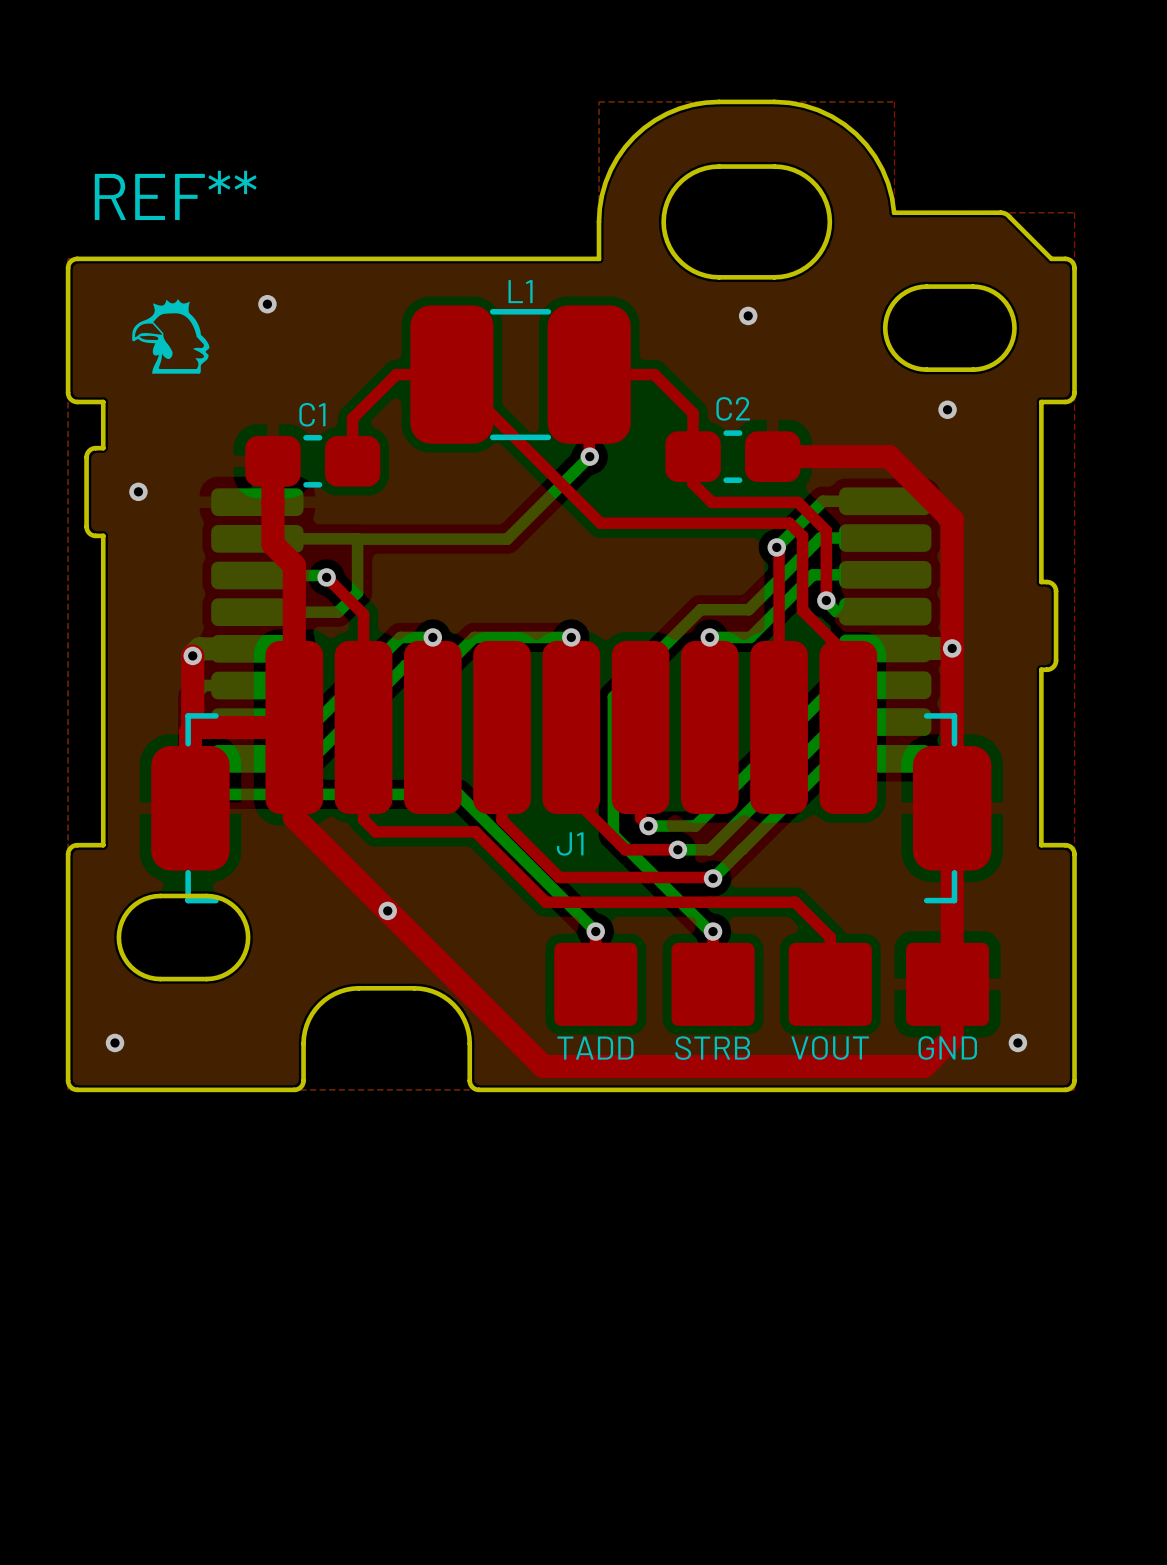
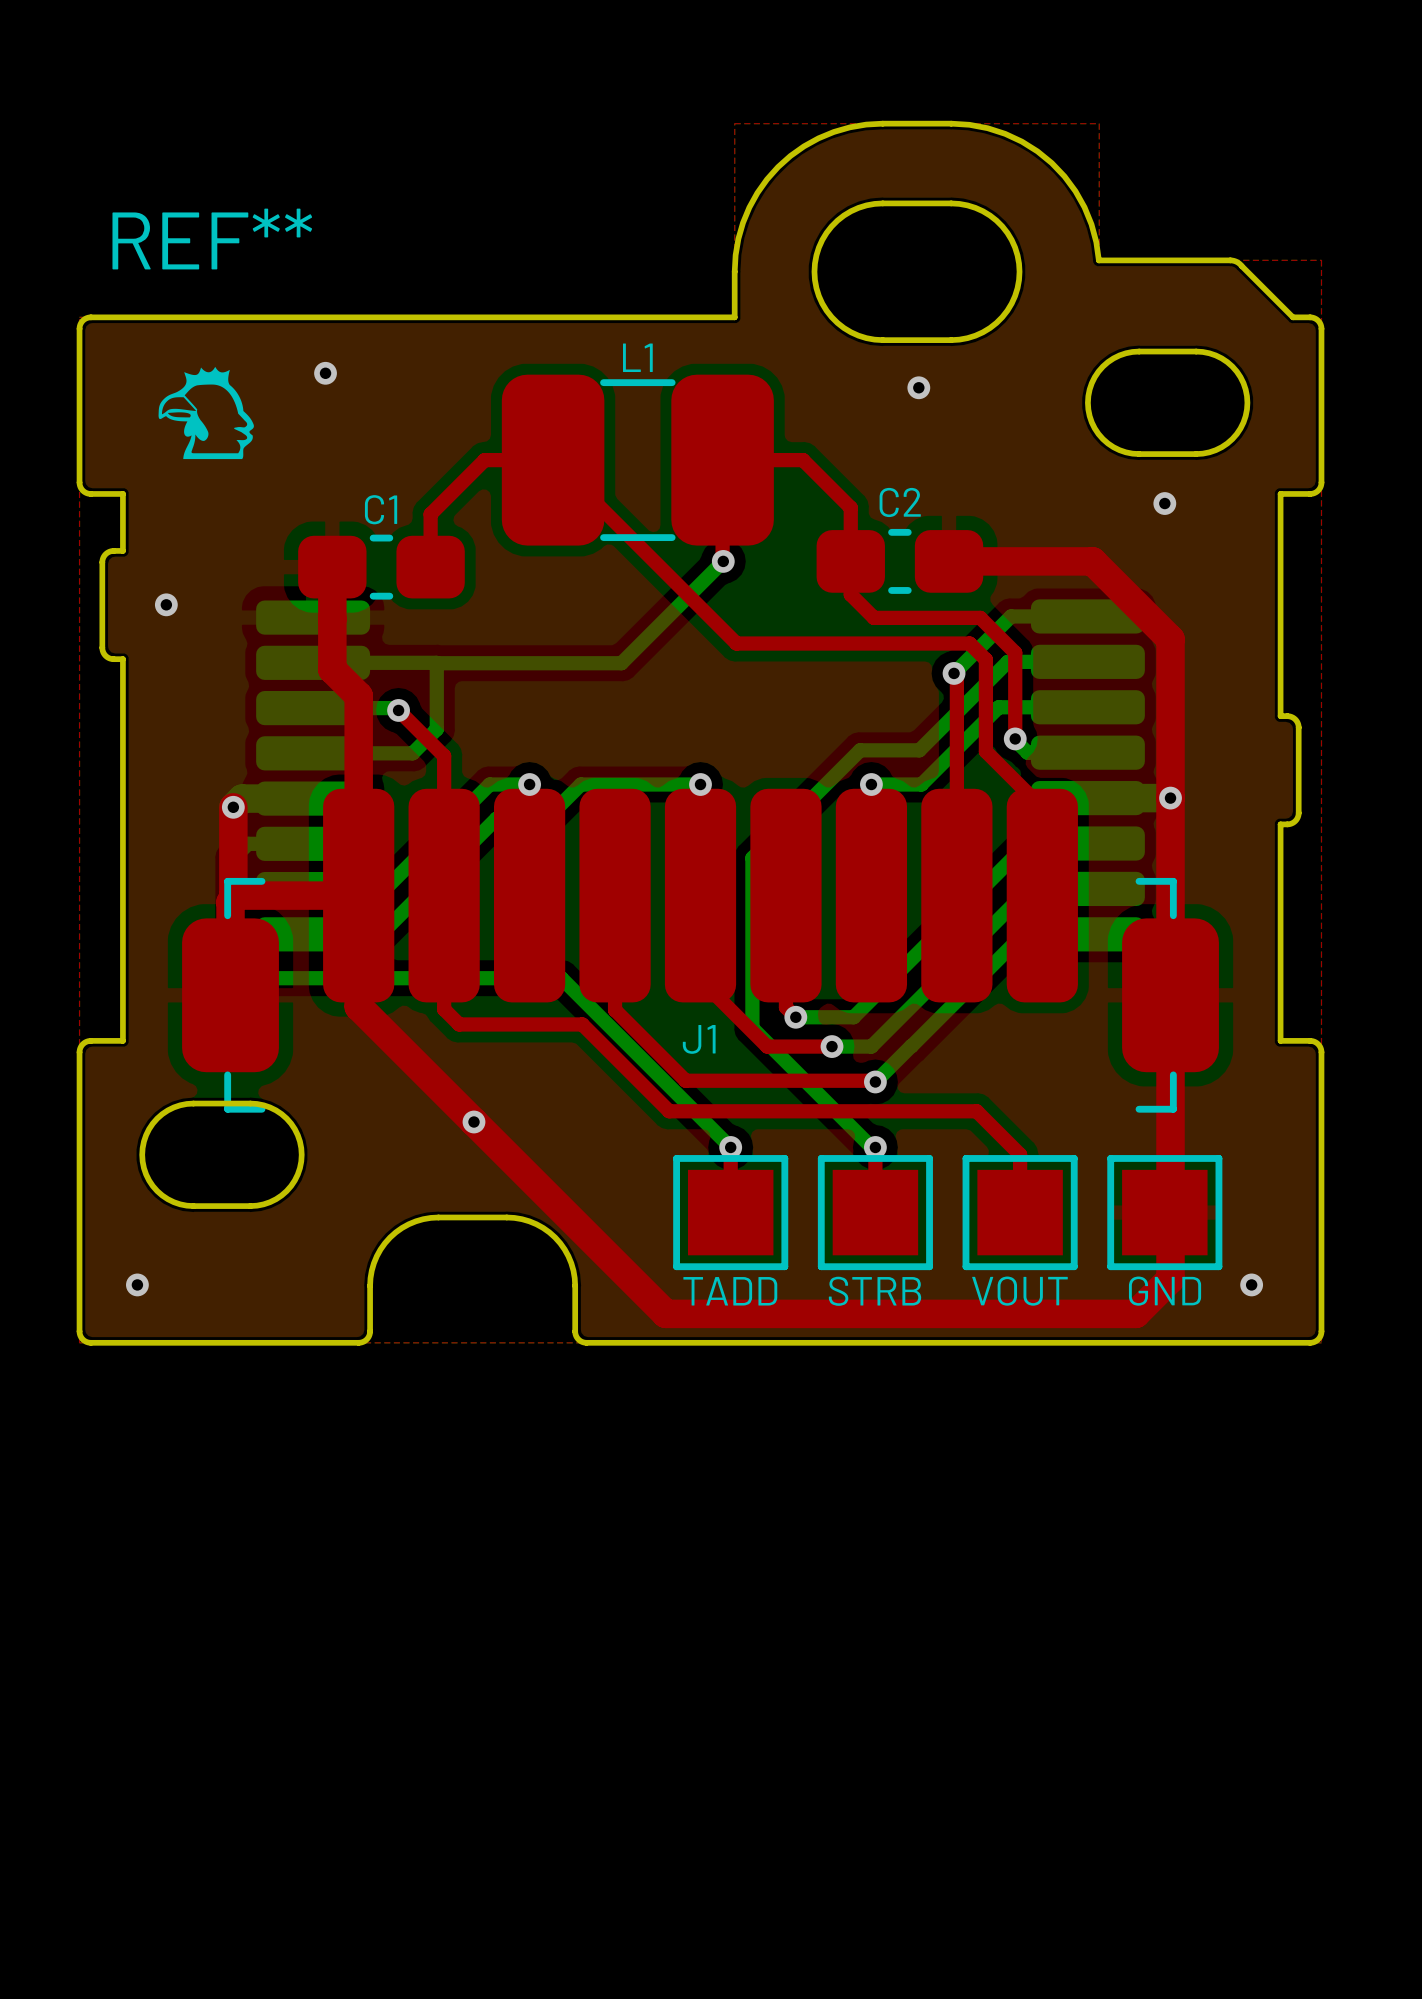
part footprint: [554, 942, 638, 1026] -> [673, 1155, 789, 1271]
part footprint: [671, 942, 755, 1026] -> [817, 1155, 933, 1271]
part footprint: [788, 942, 872, 1026] -> [962, 1155, 1078, 1271]
part footprint: [906, 942, 990, 1026] -> [1107, 1155, 1223, 1271]

